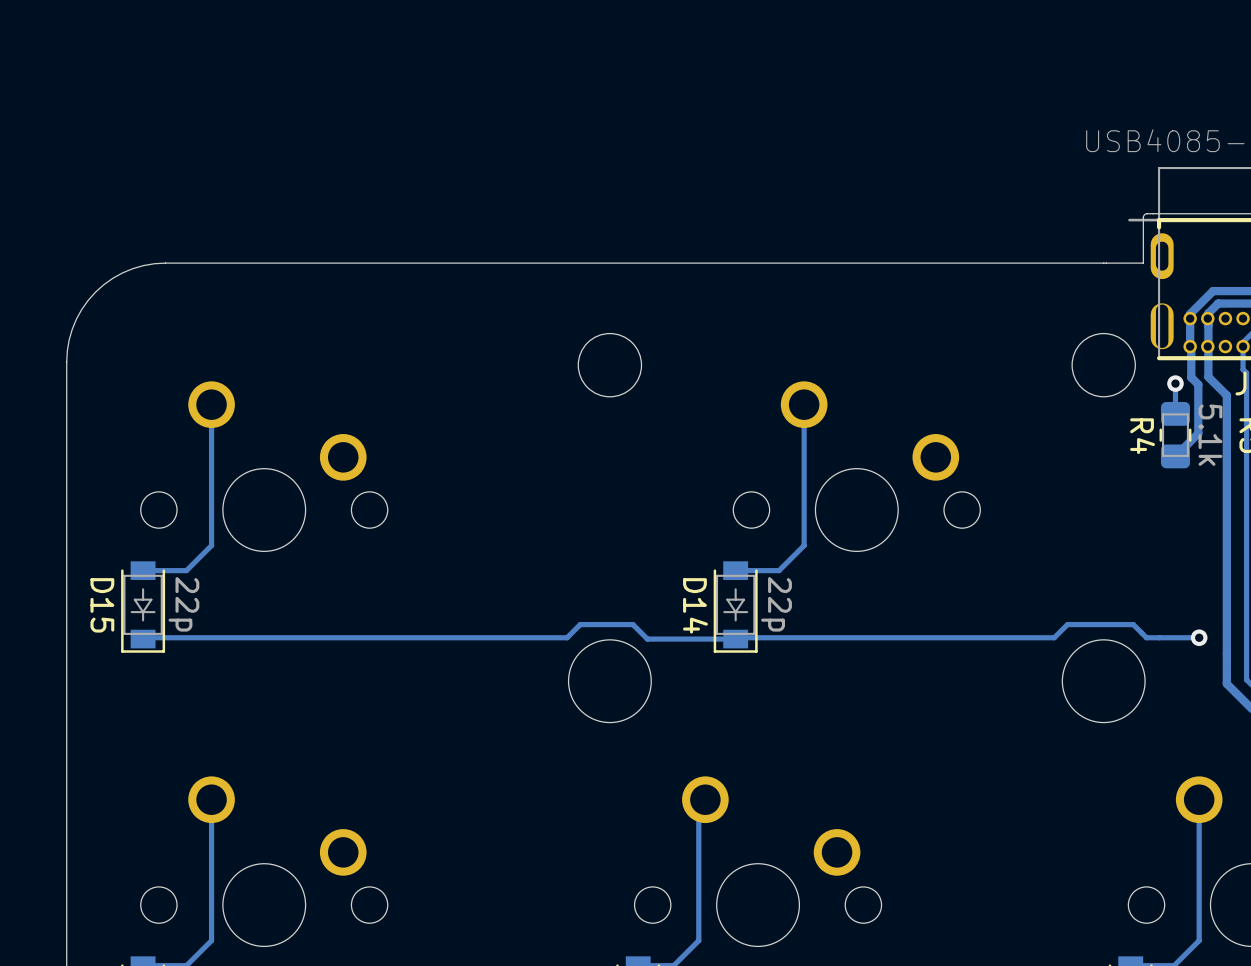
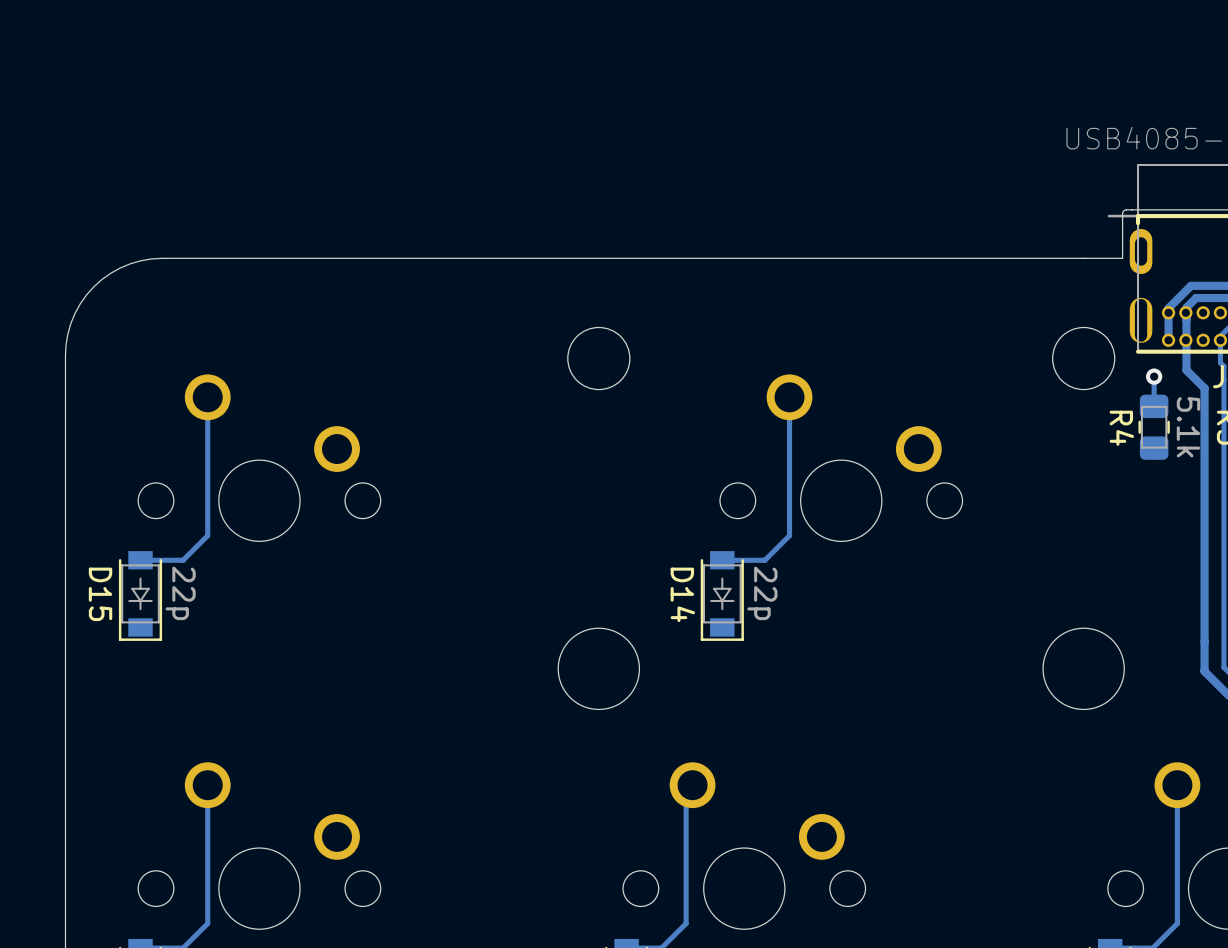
track: (1191, 345) (1191, 377) (1198, 384) (1198, 433) (1175, 456) -> none
track: (145, 637) (567, 637) (580, 624) (632, 624) (647, 639) (735, 639) -> none
track: (1199, 637) (1146, 637) (1133, 624) (1067, 624) (1054, 637) (738, 637) -> none
via: (1199, 637) -> none

